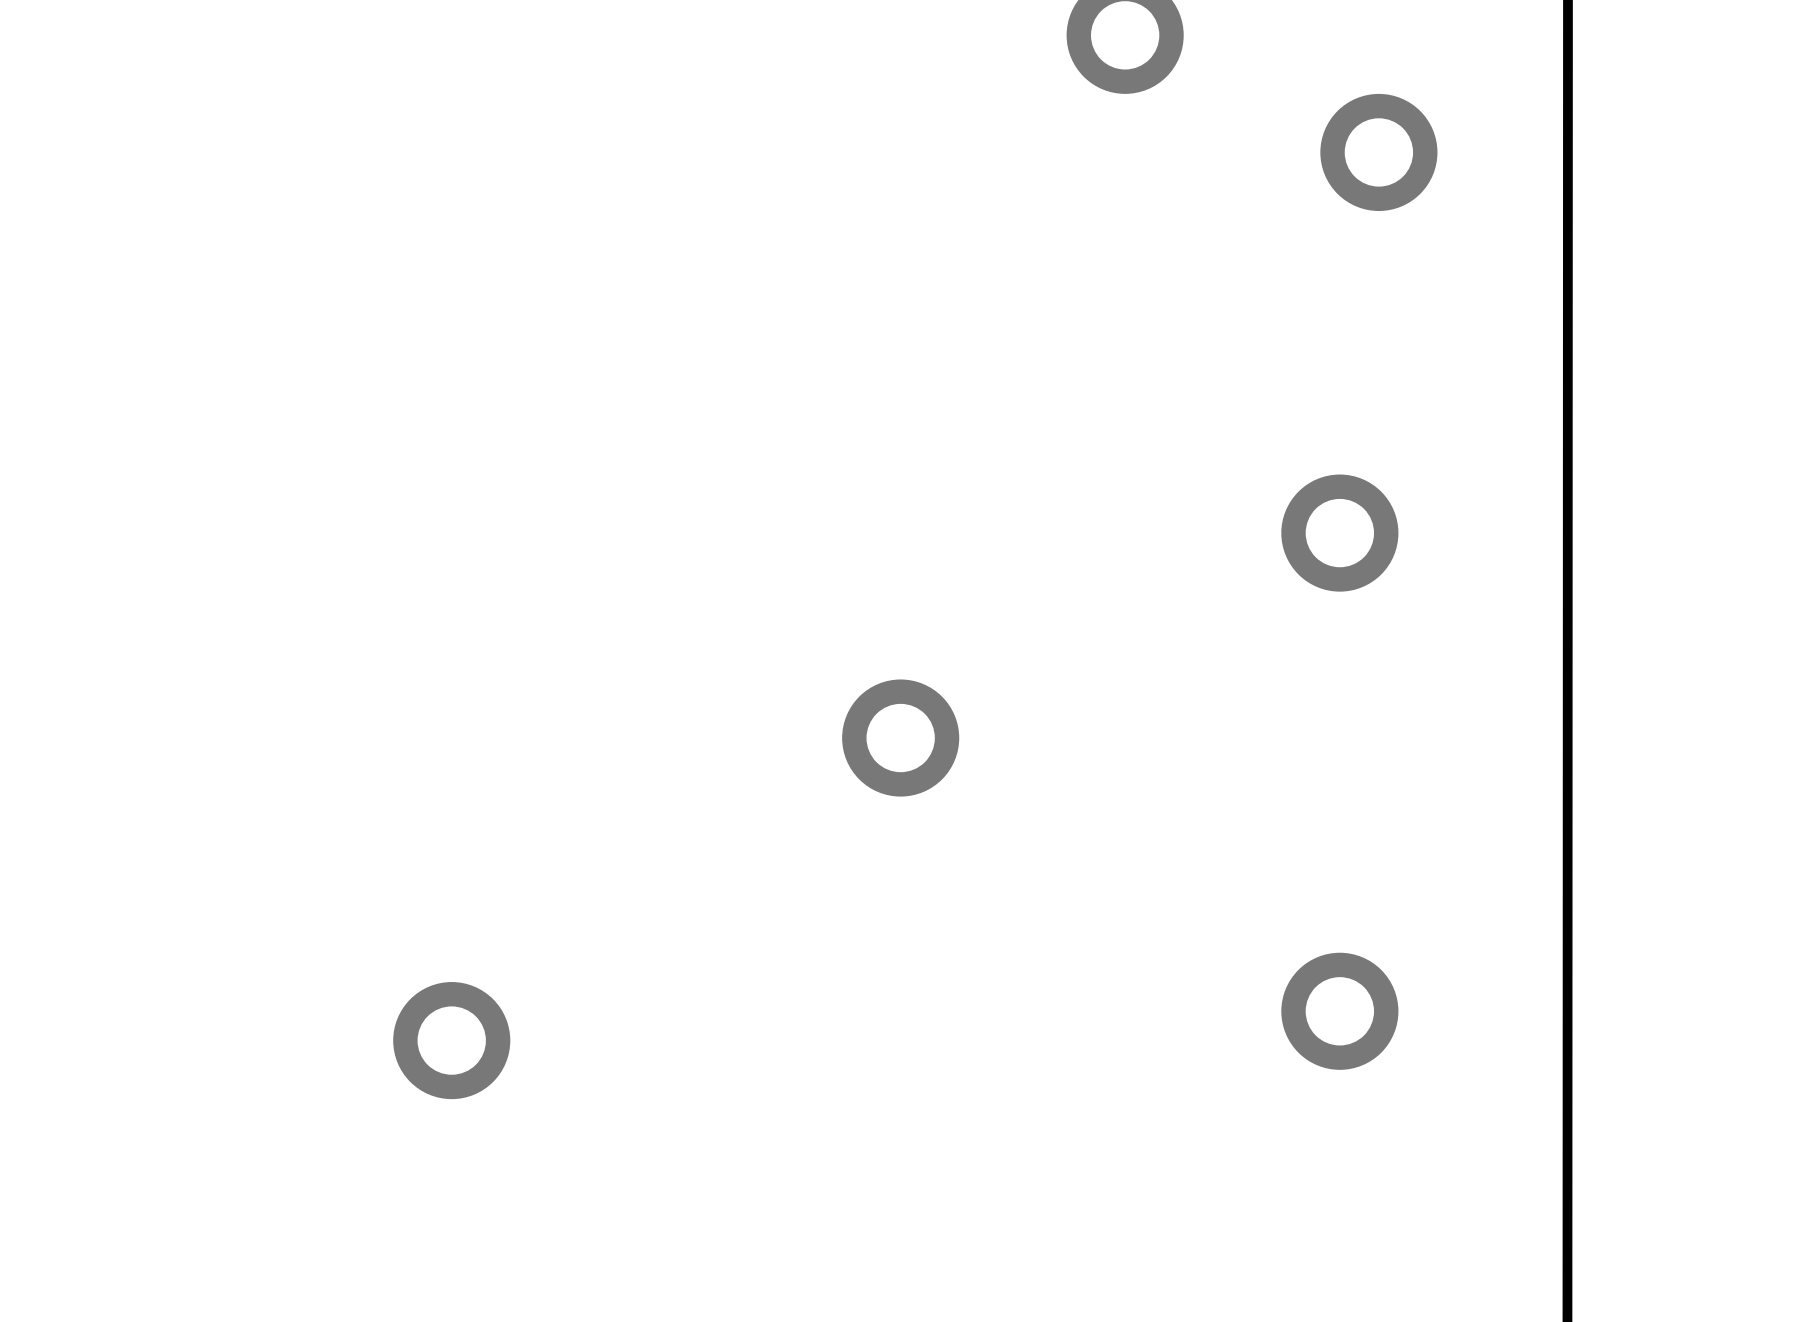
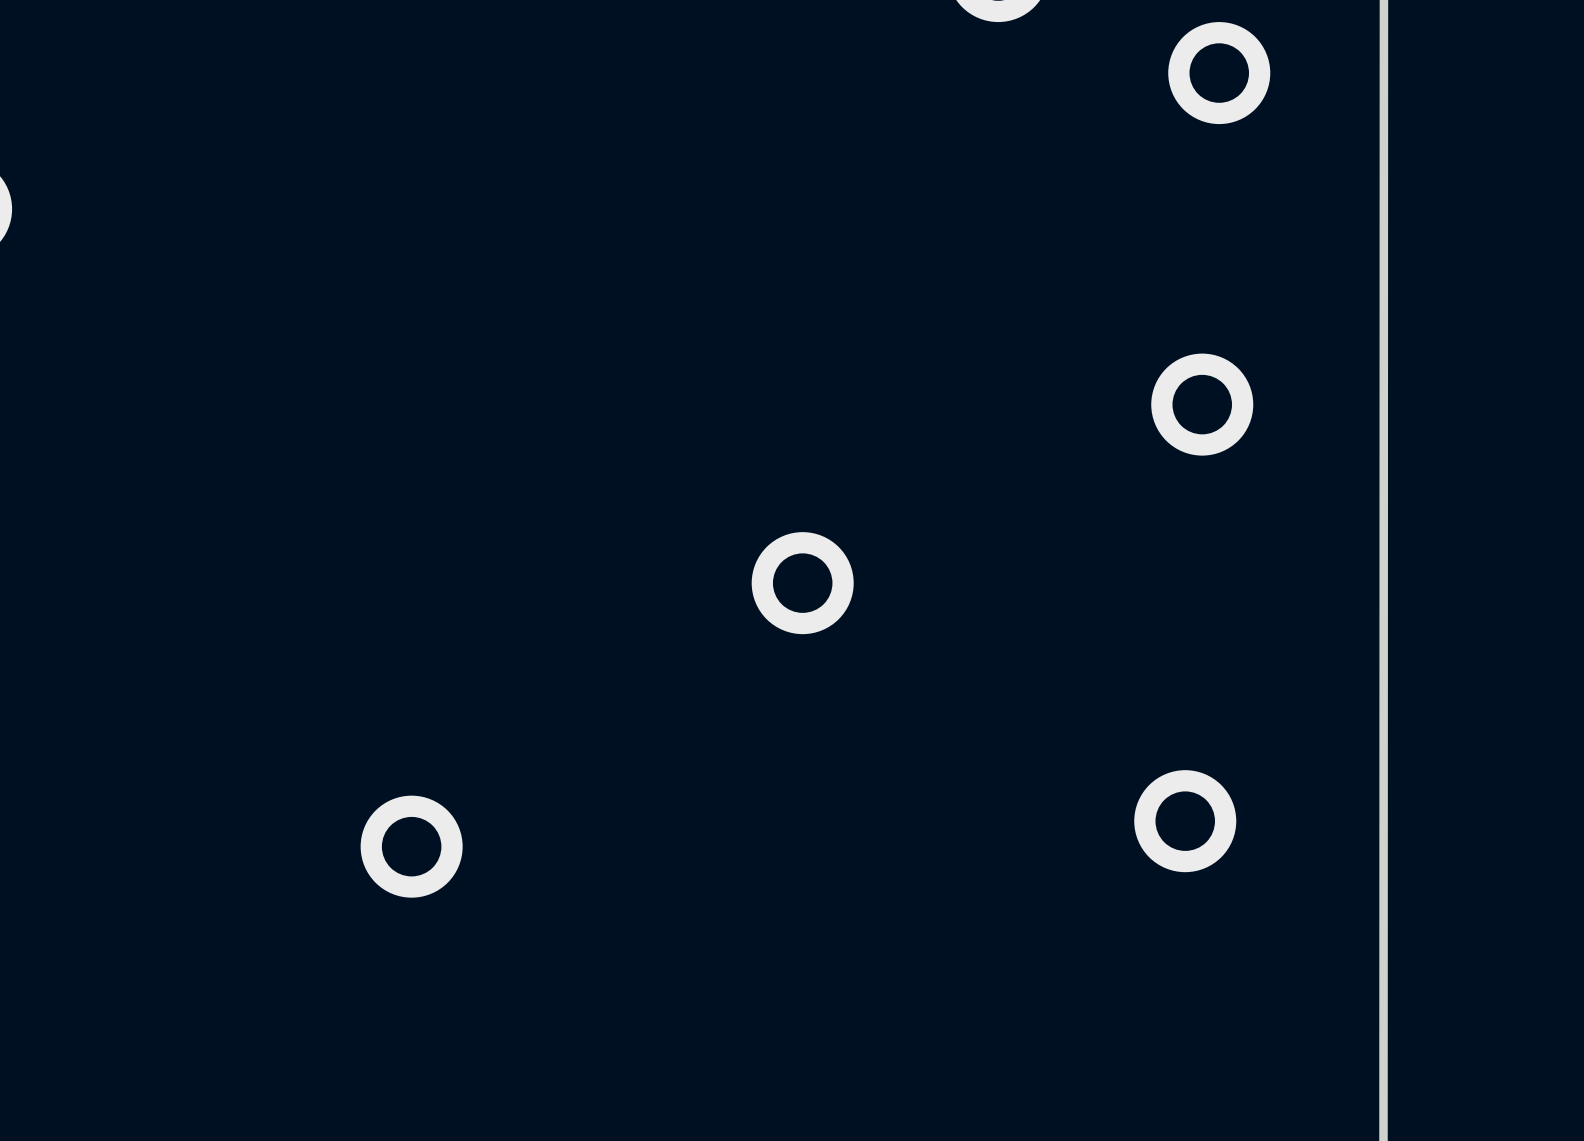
via position: (1339, 533) -> (1202, 404)

